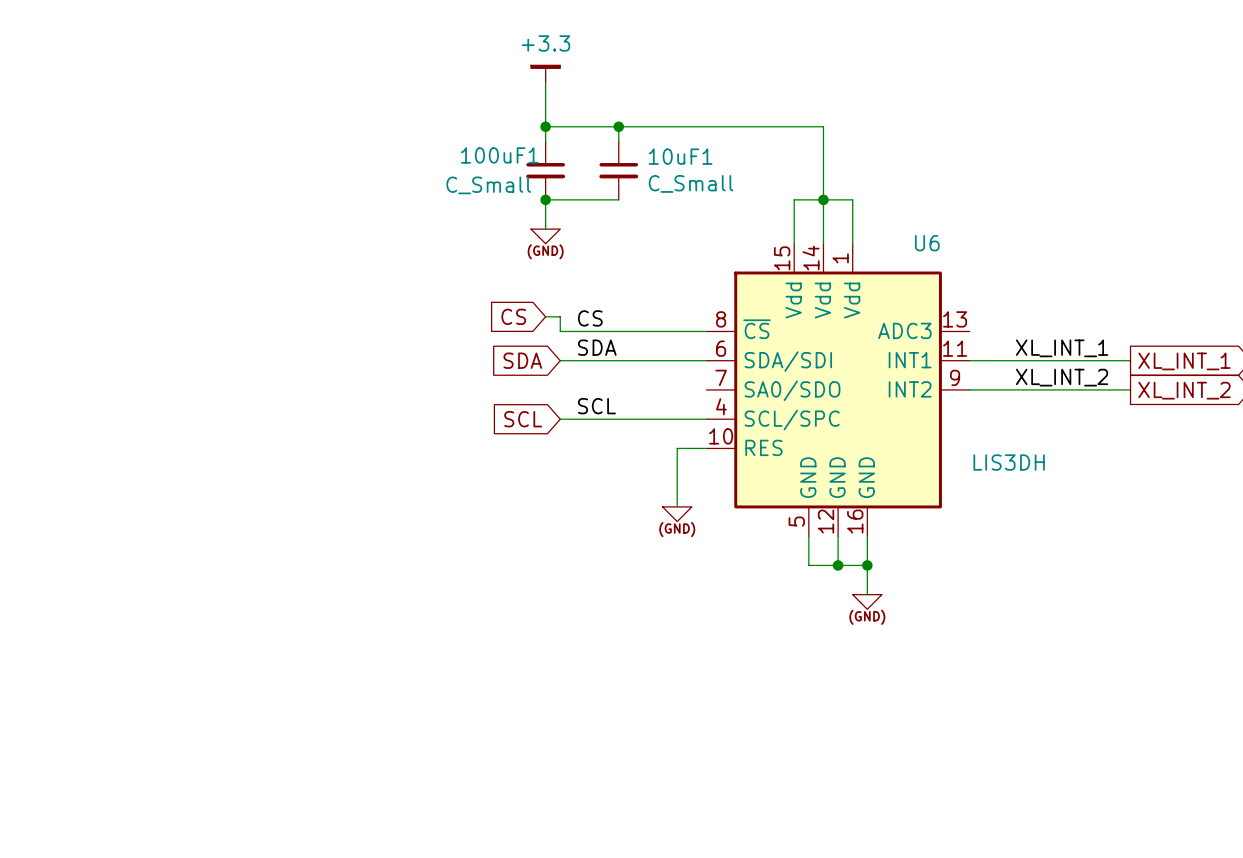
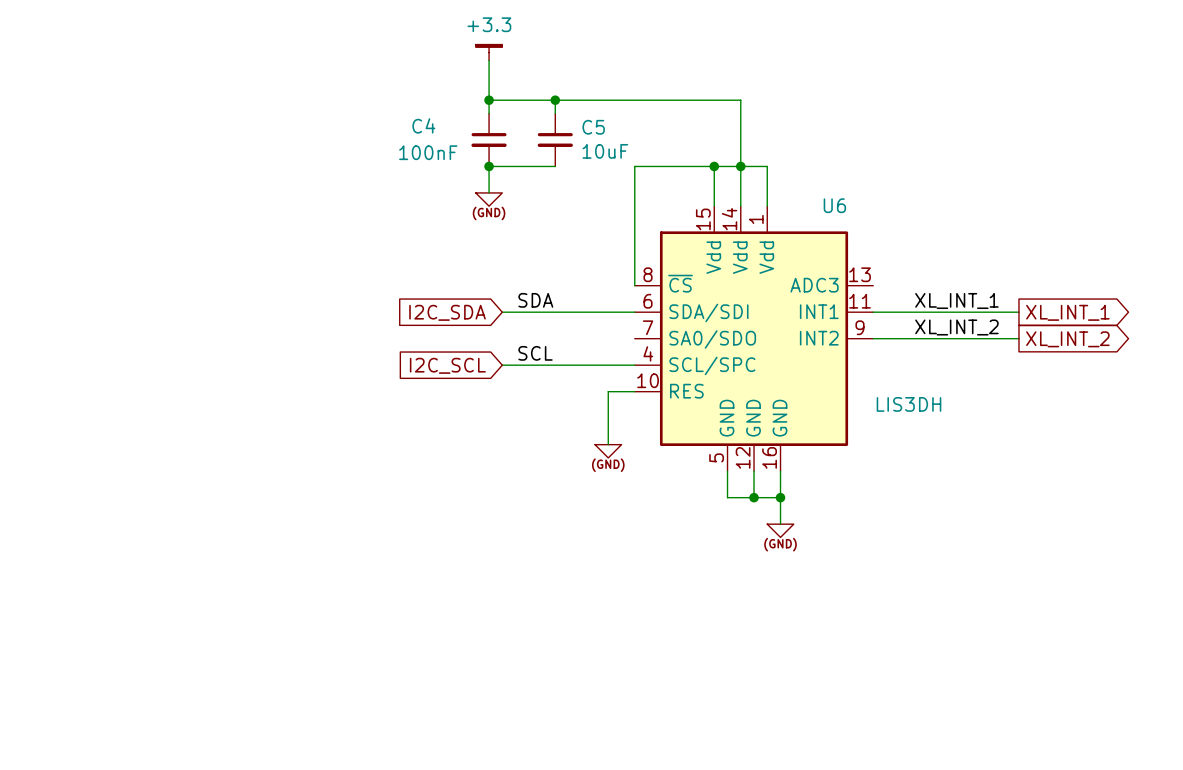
100uF1 name: 100uF1 (499, 155) -> C4 (423, 125)
10uF1 name: 10uF1 (680, 156) -> C5 (593, 127)
10uF1 value: C_Small (691, 183) -> 10uF (605, 151)
100uF1 value: C_Small (488, 185) -> 100nF (428, 152)
junction: none -> (714, 166)
global label: CS (513, 316) -> none
wire: (545, 316) (560, 316) (560, 331) (706, 331) -> (714, 166) (634, 166) (634, 285)
label: CS (590, 318) -> none
global label: SDA (522, 360) -> I2C_SDA (447, 312)
global label: SCL (523, 419) -> I2C_SCL (447, 365)

